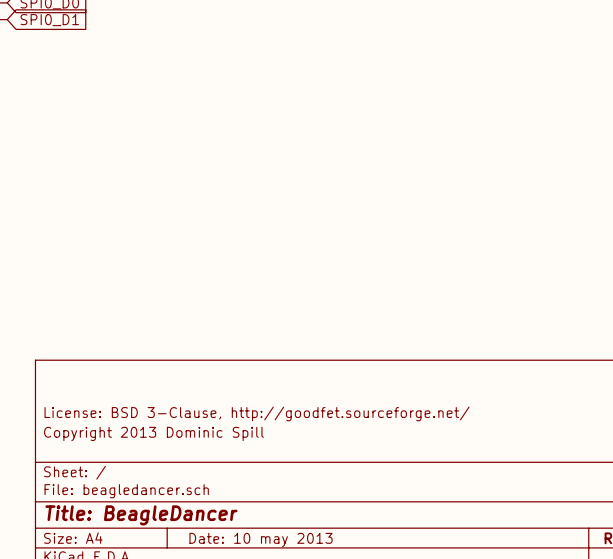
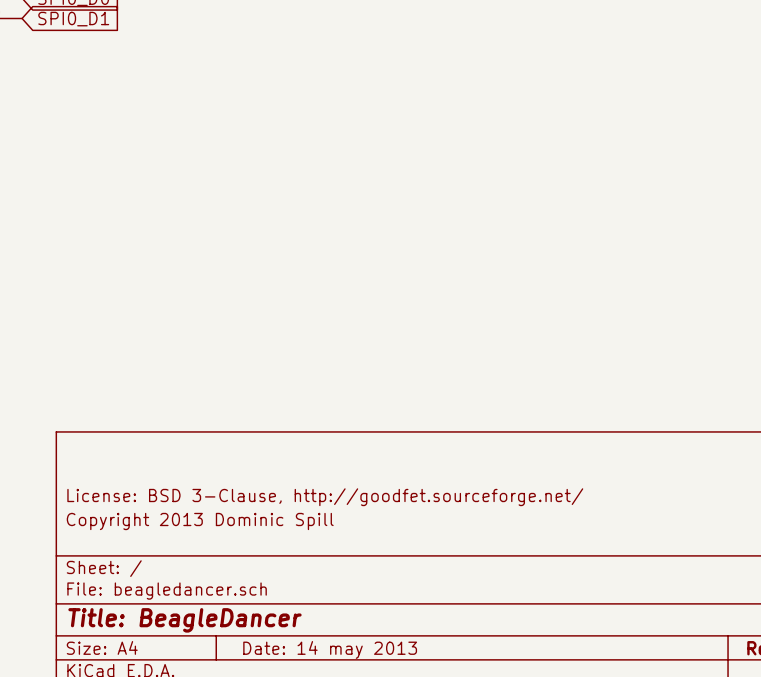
title block: Date: 10 may 2013 (261, 539) -> Date: 14 may 2013 (330, 649)

